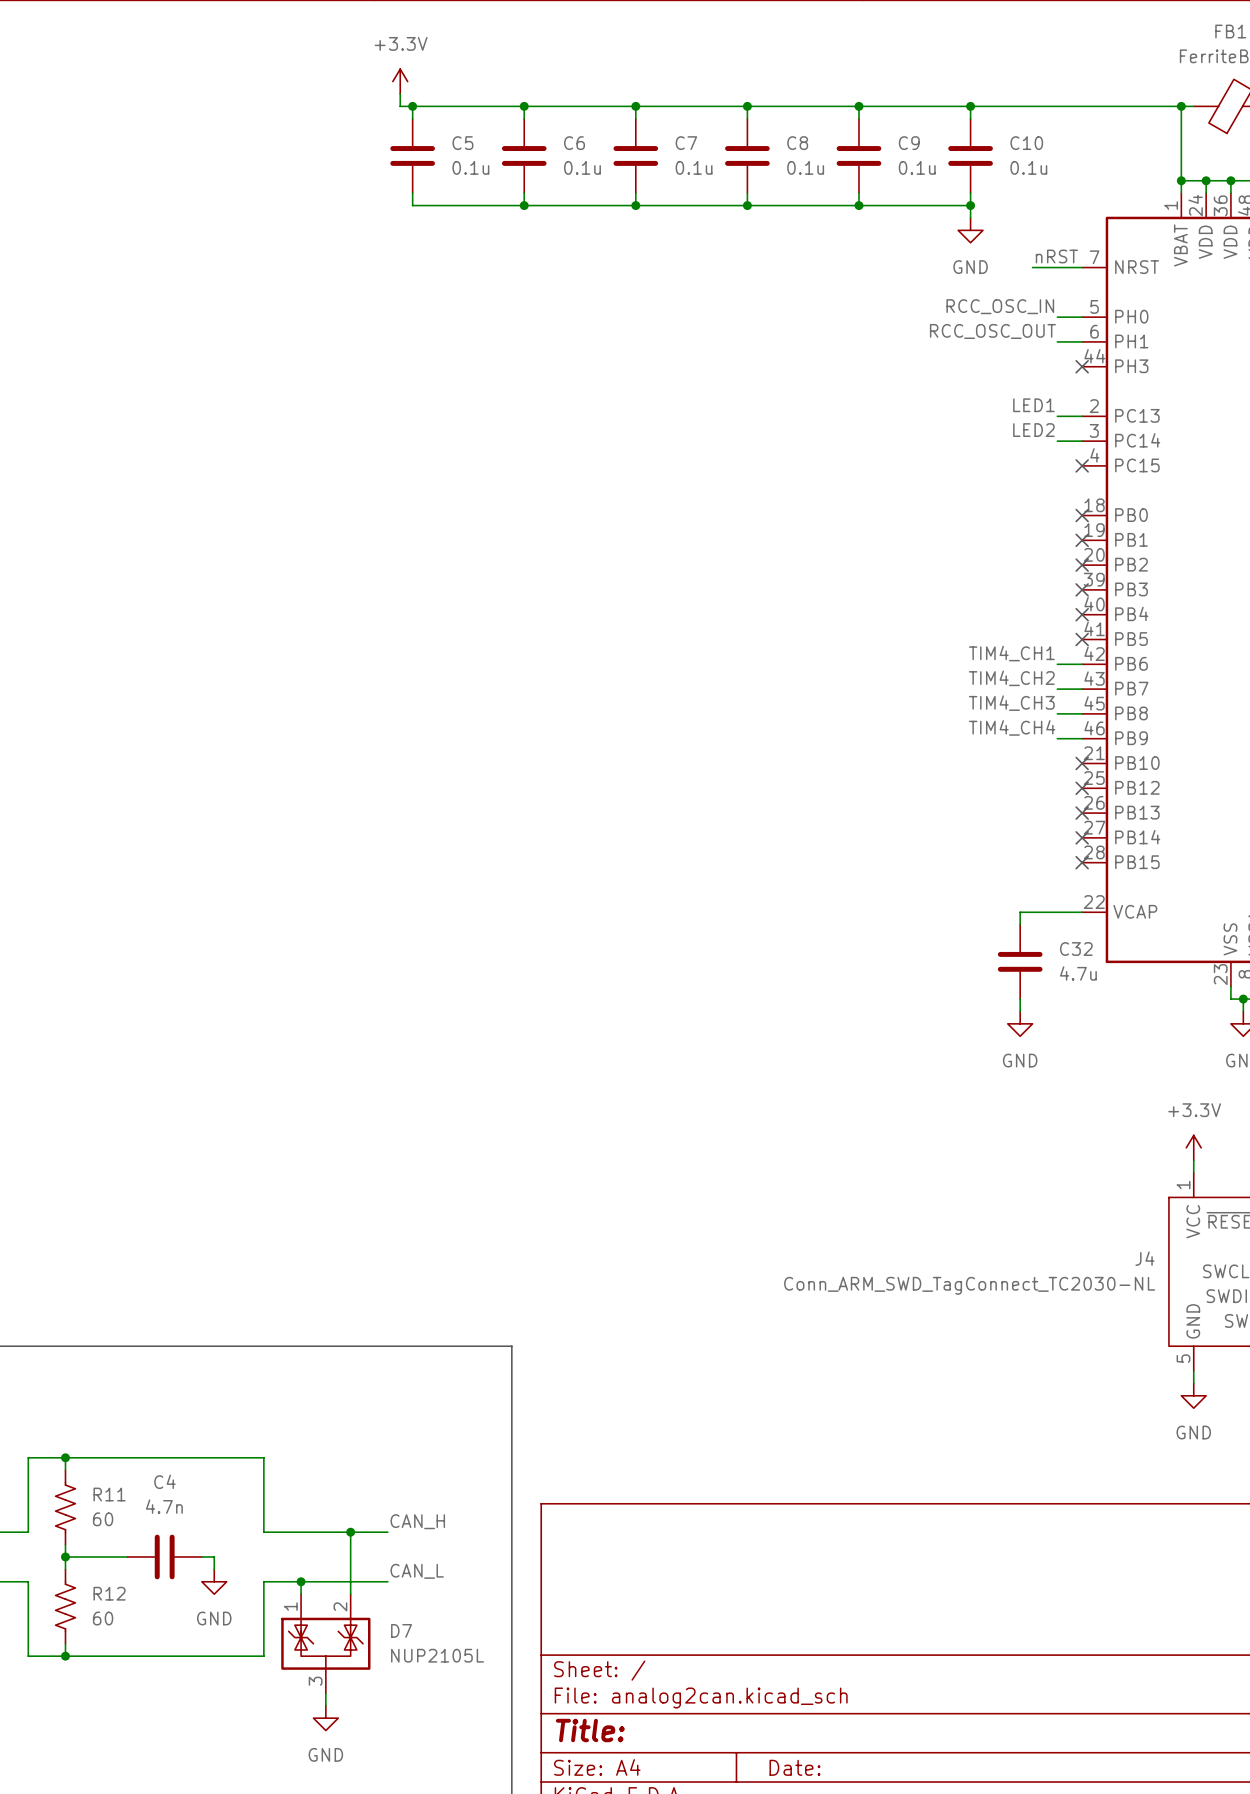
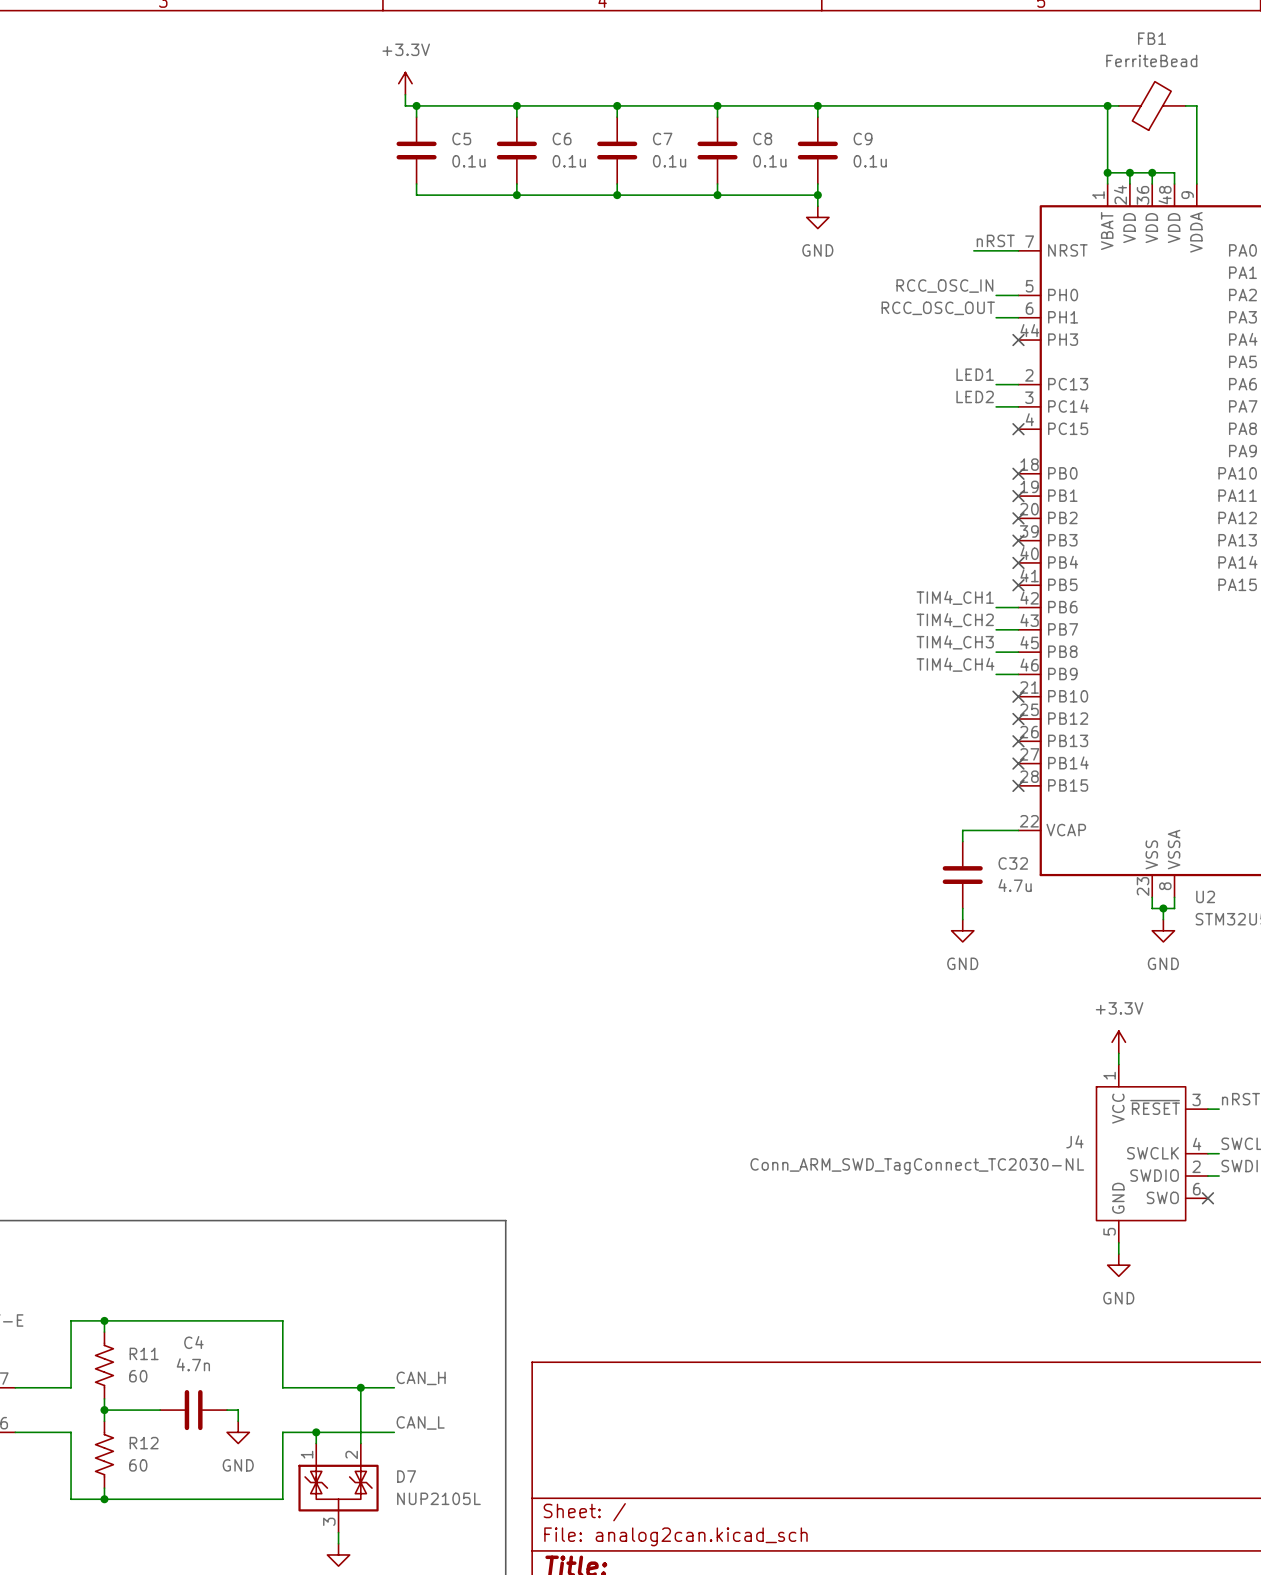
wire: (970, 106) (970, 118) -> none
junction: (970, 106) -> none
C10: 0.1u (970, 155) -> none
wire: (970, 193) (970, 217) -> none
wire: (858, 205) (970, 205) -> (817, 195) (817, 206)
junction: (970, 205) -> none
power symbol position: GND (970, 230) -> GND (817, 217)

